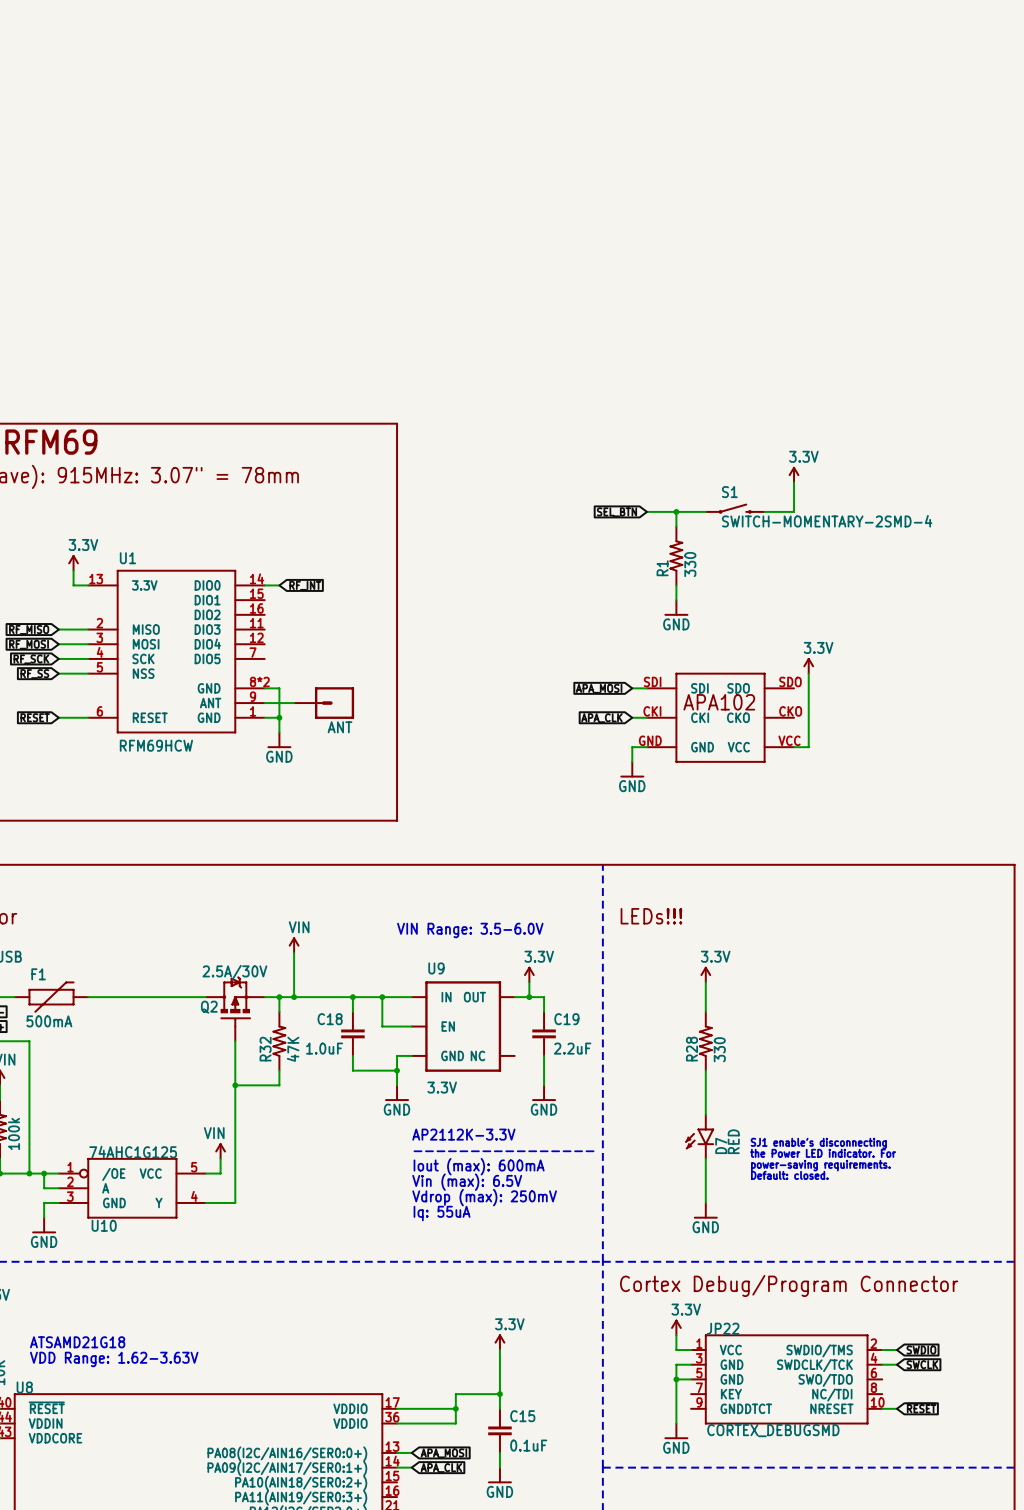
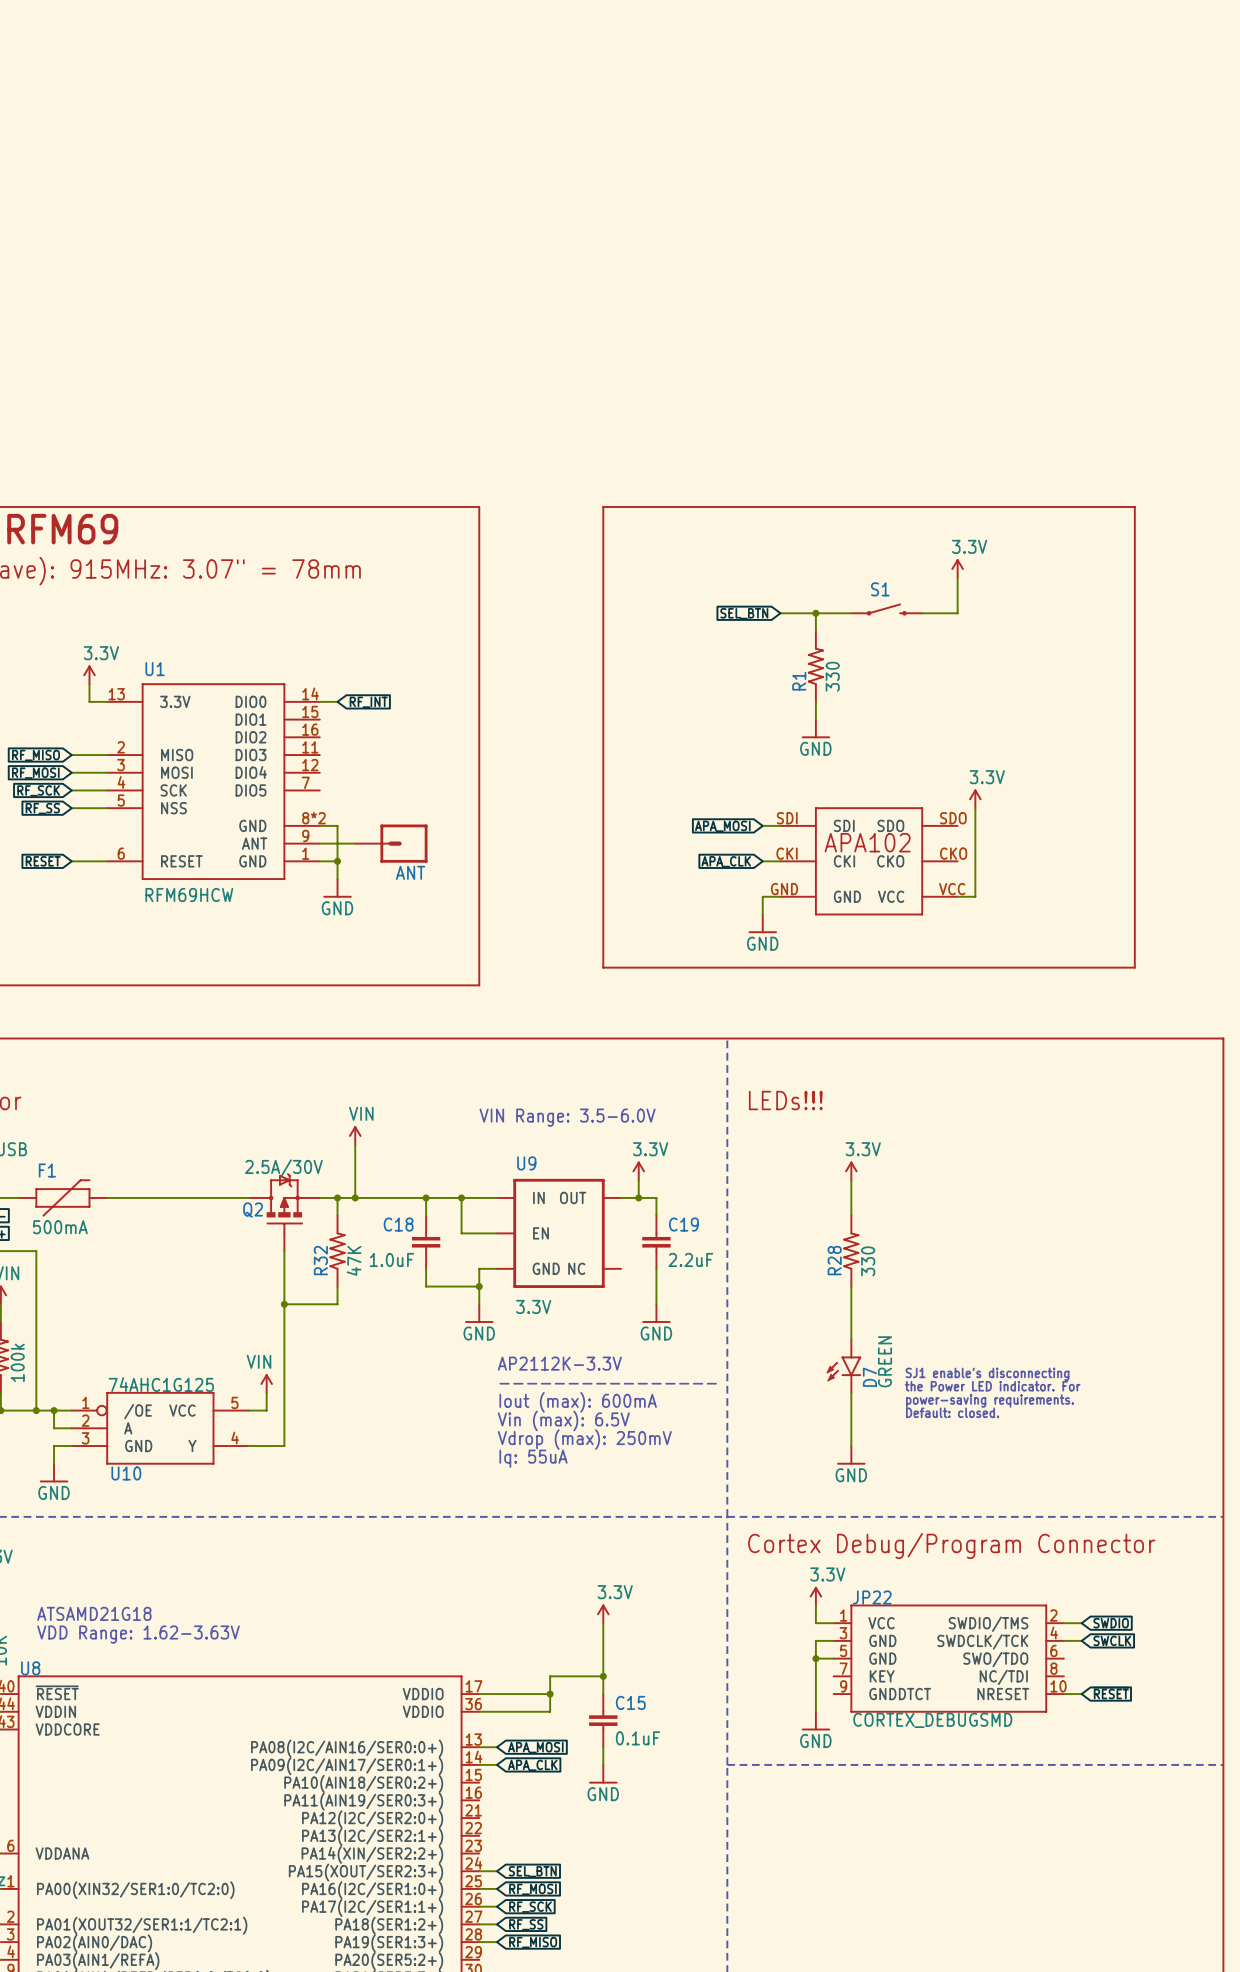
line: none -> (603, 506) (1134, 506) (1134, 967) (603, 967) (603, 506)
S1 value: SWITCH-MOMENTARY-2SMD-4 (827, 521) -> none
D7 value: RED (733, 1141) -> GREEN (885, 1361)

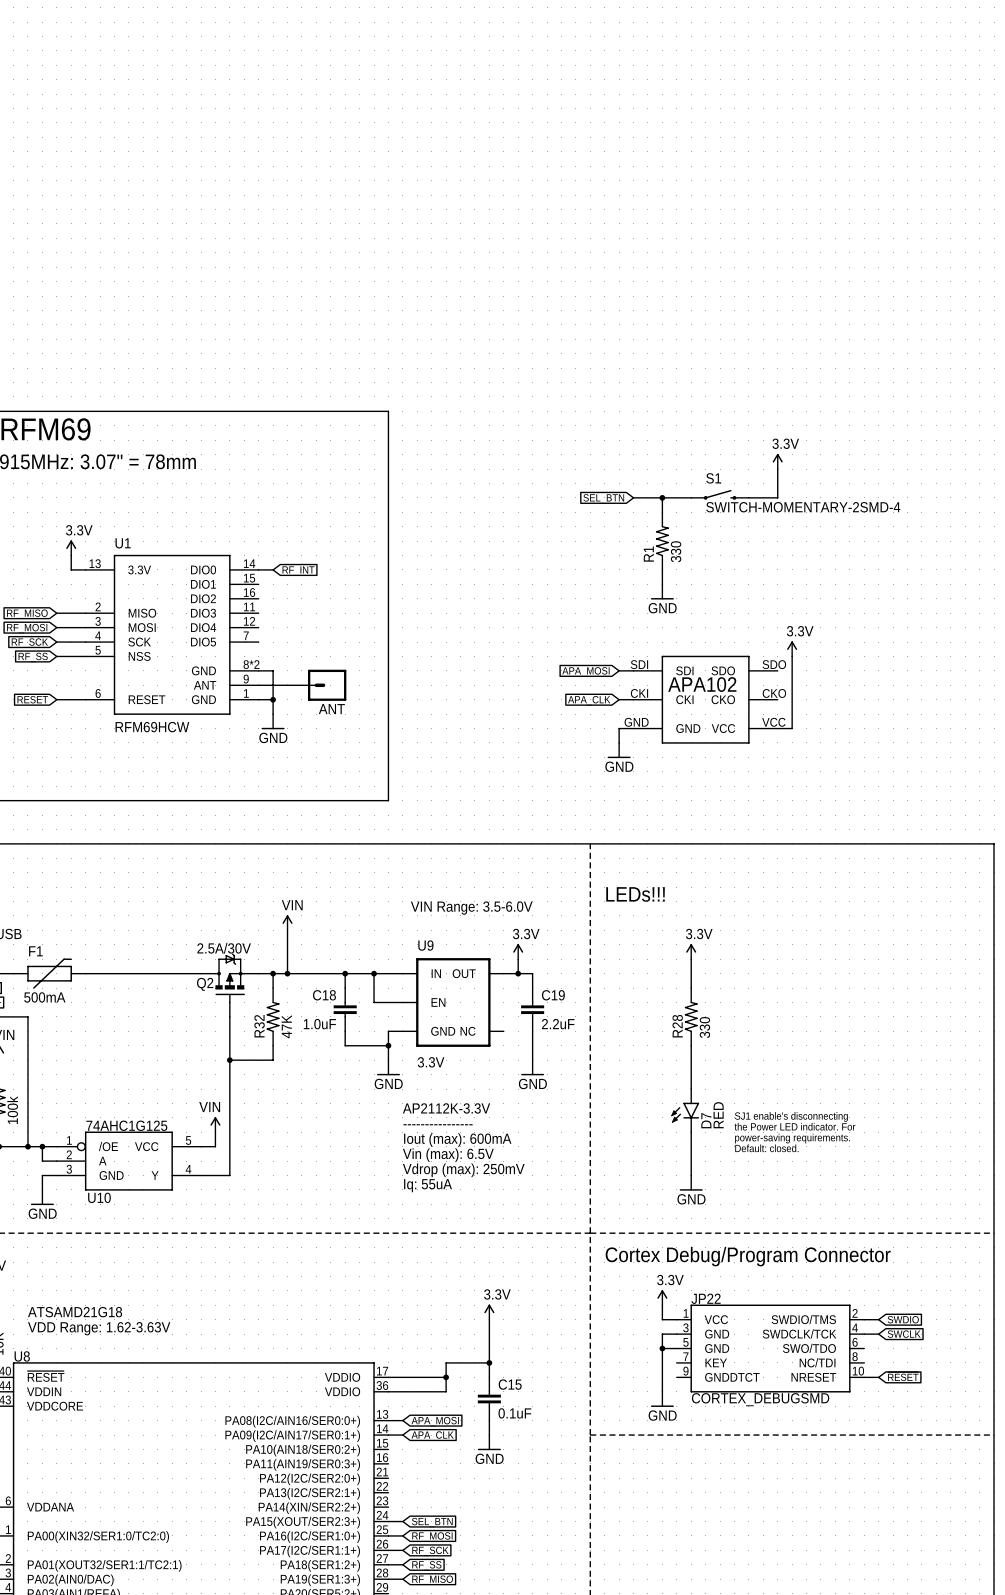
line: (603, 506) (1134, 506) (1134, 967) (603, 967) (603, 506) -> none
S1 value: none -> SWITCH-MOMENTARY-2SMD-4 (803, 507)
D7 value: GREEN (885, 1361) -> RED (718, 1115)

